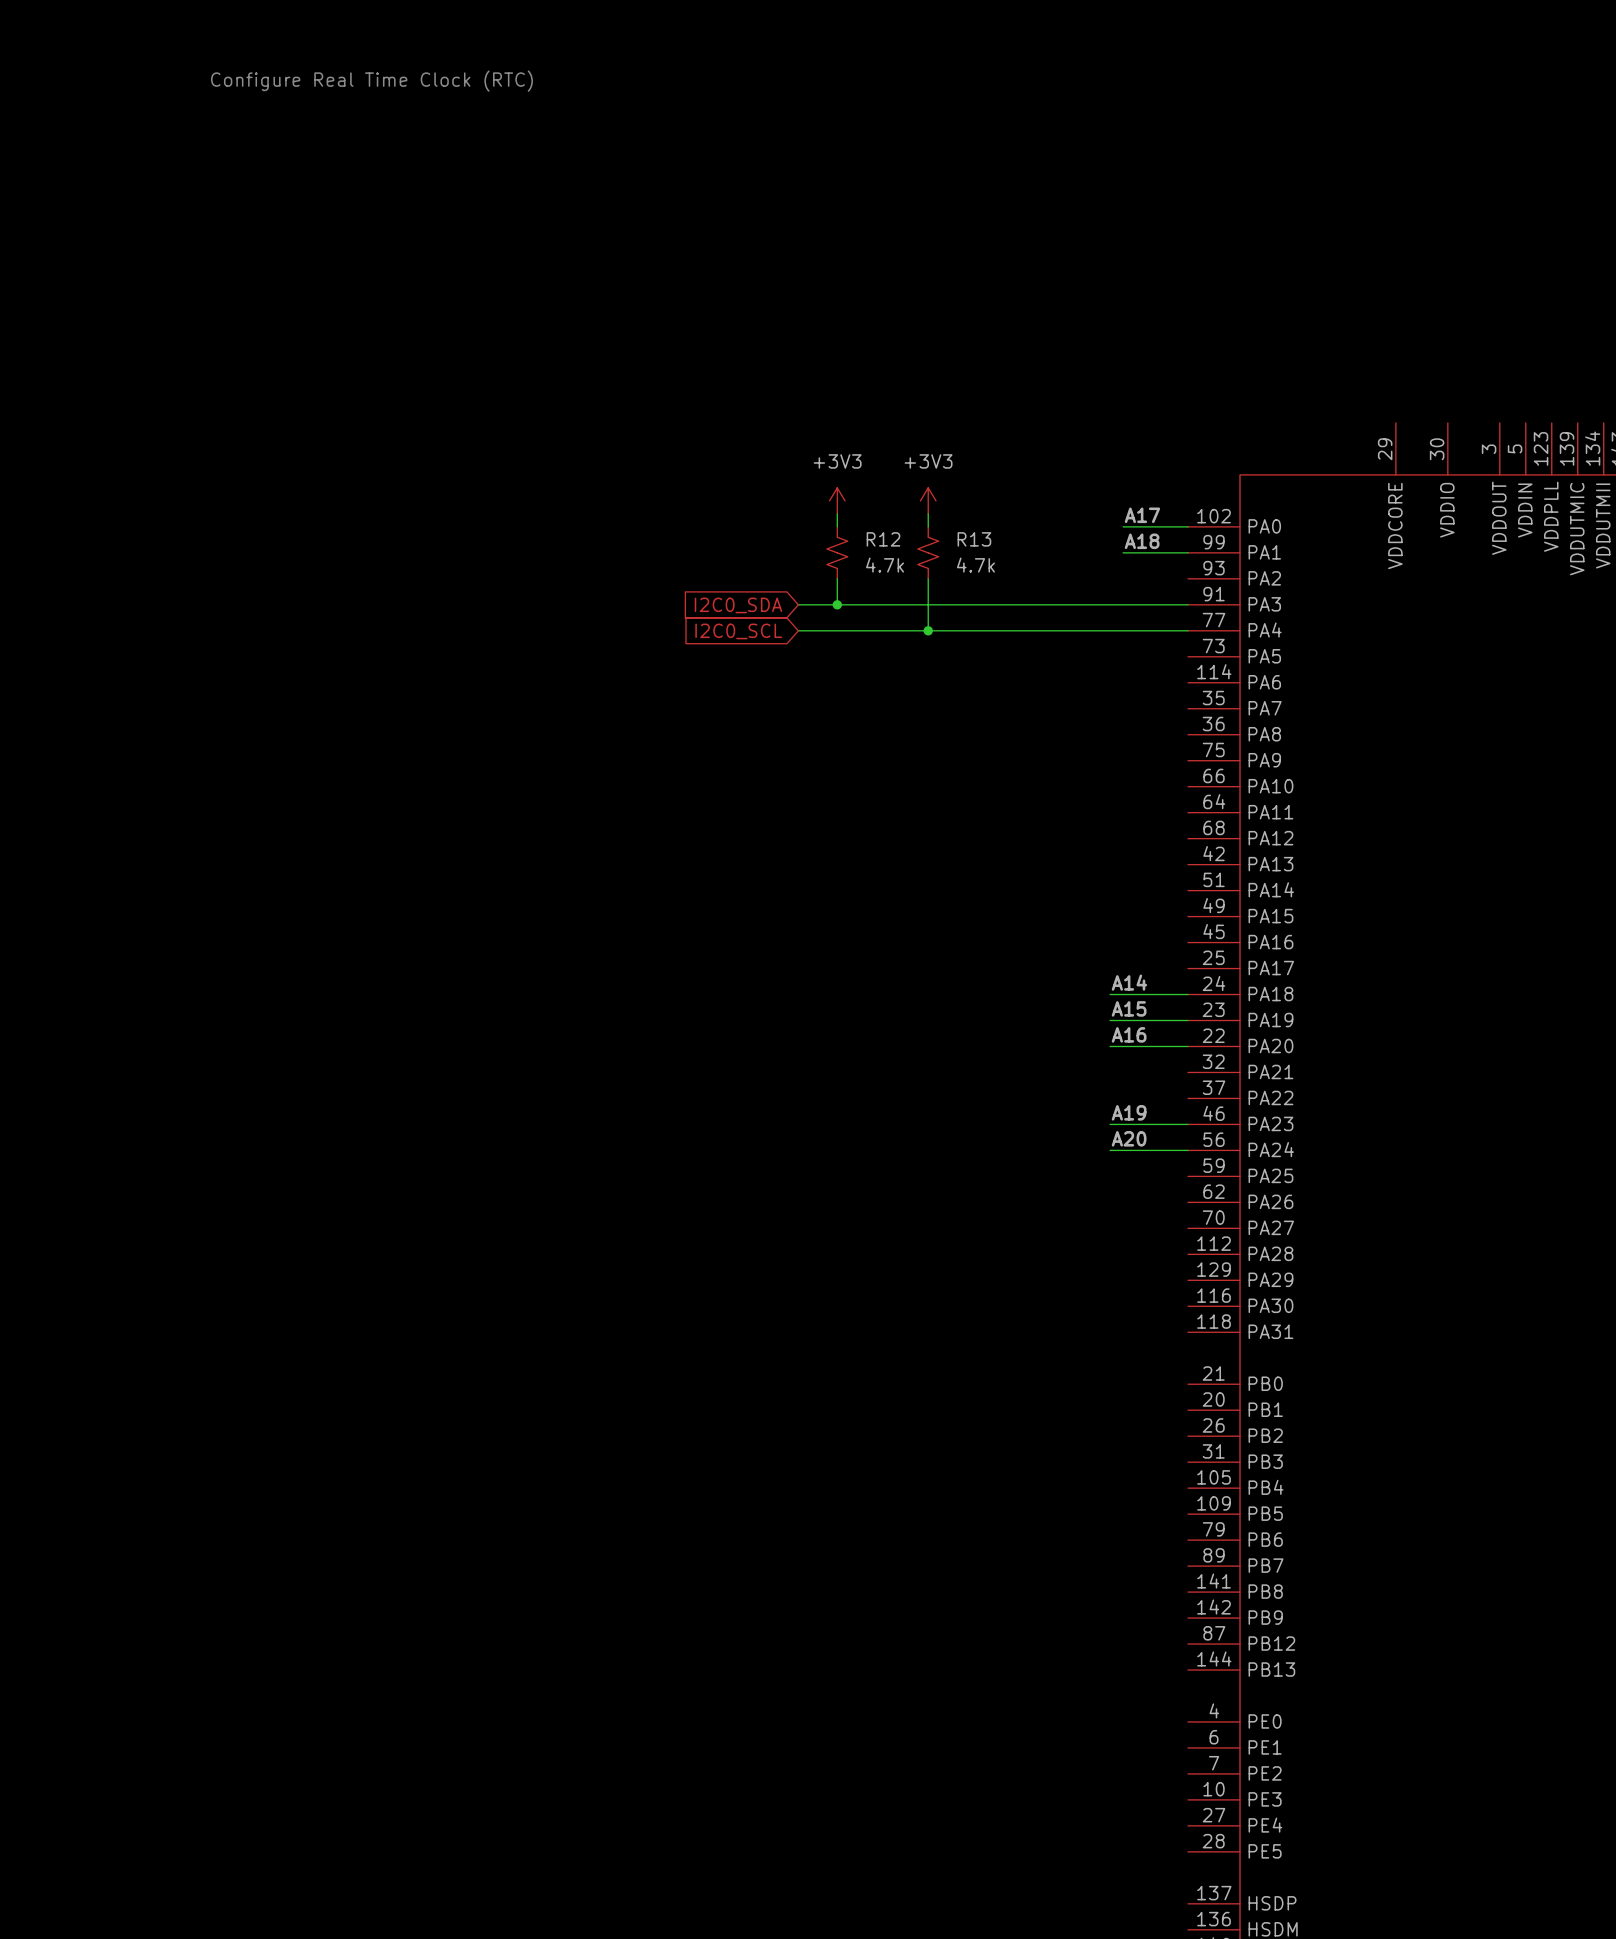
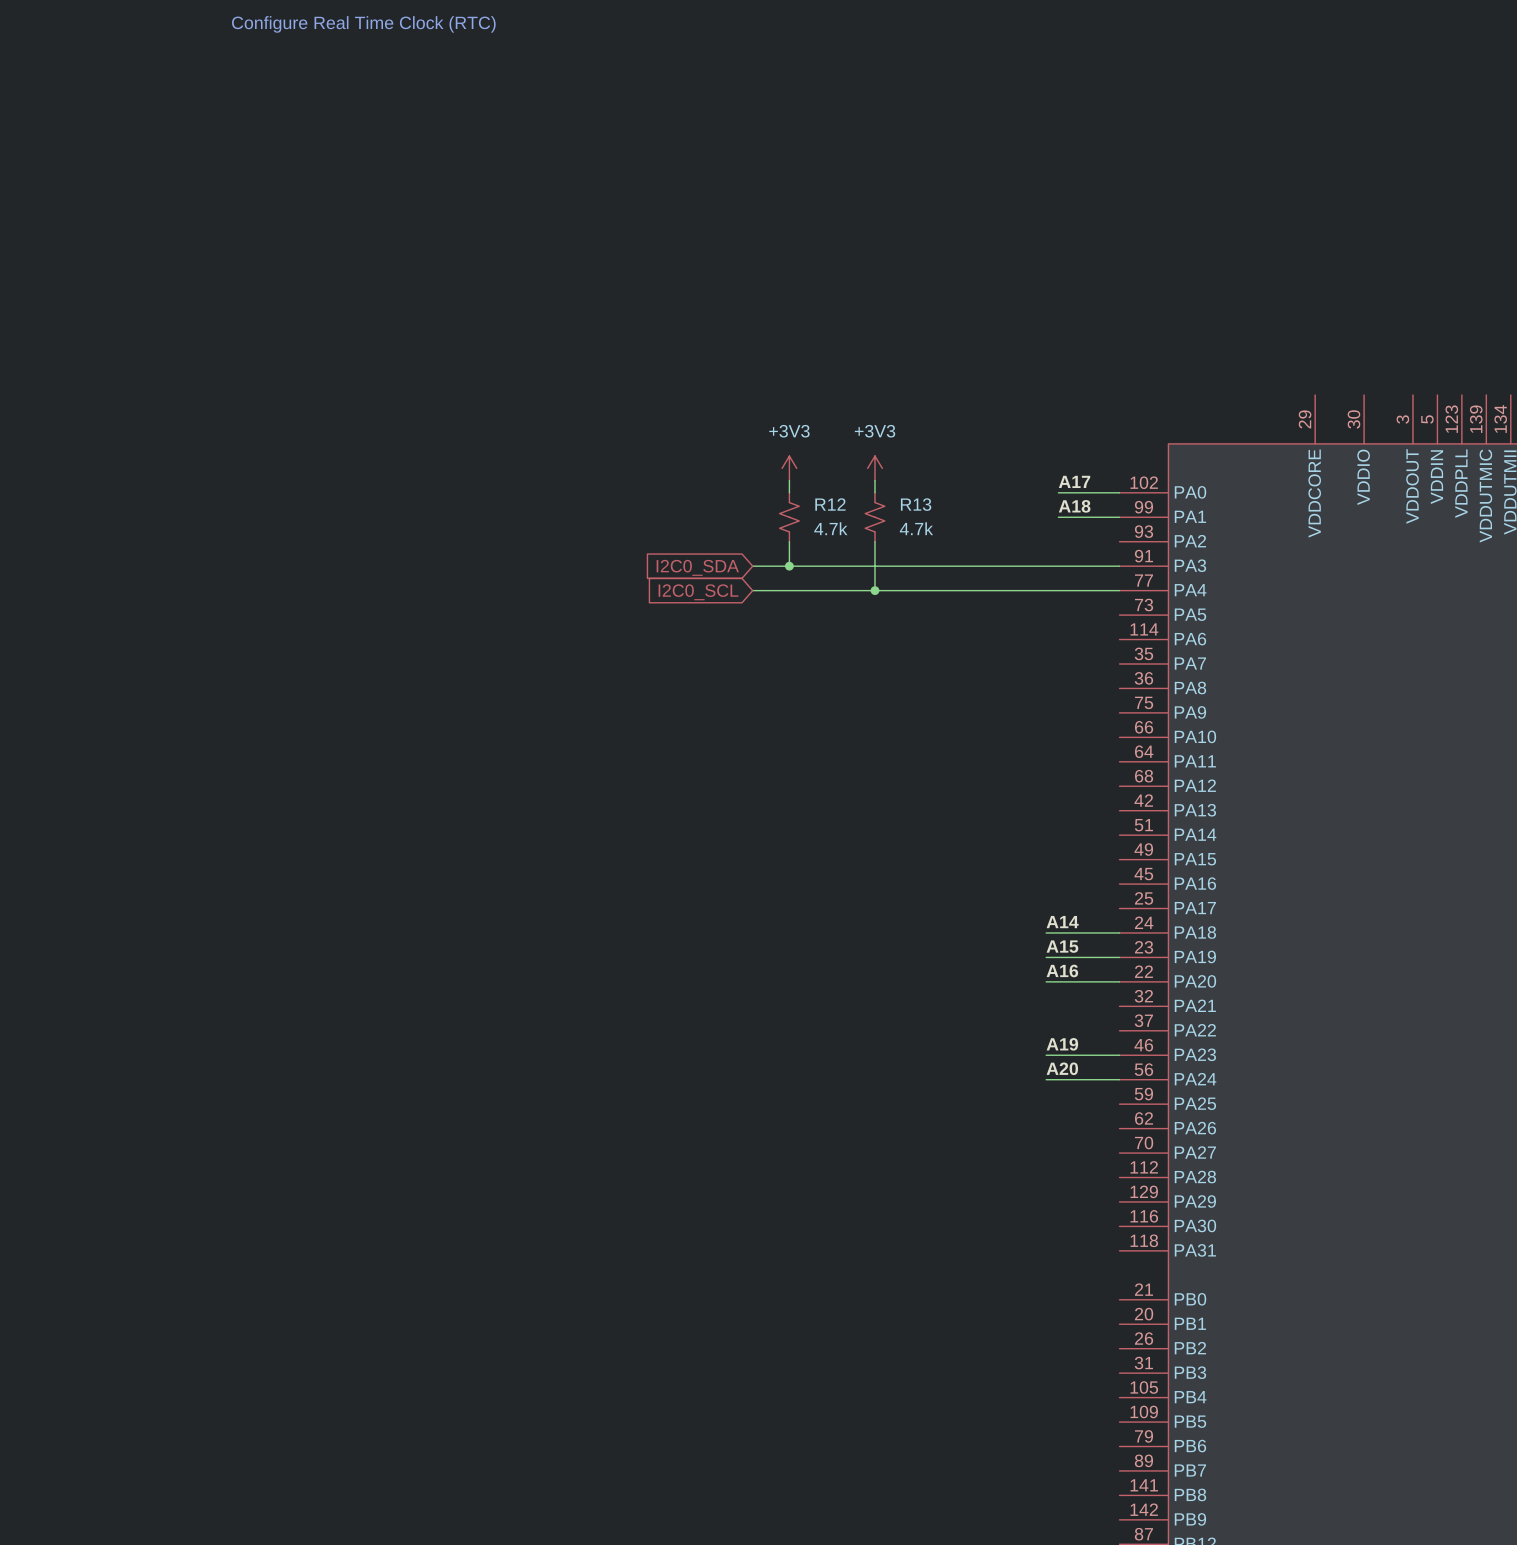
text position: Configure Real Time Clock (RTC) (371, 81) -> Configure Real Time Clock (RTC) (363, 24)

